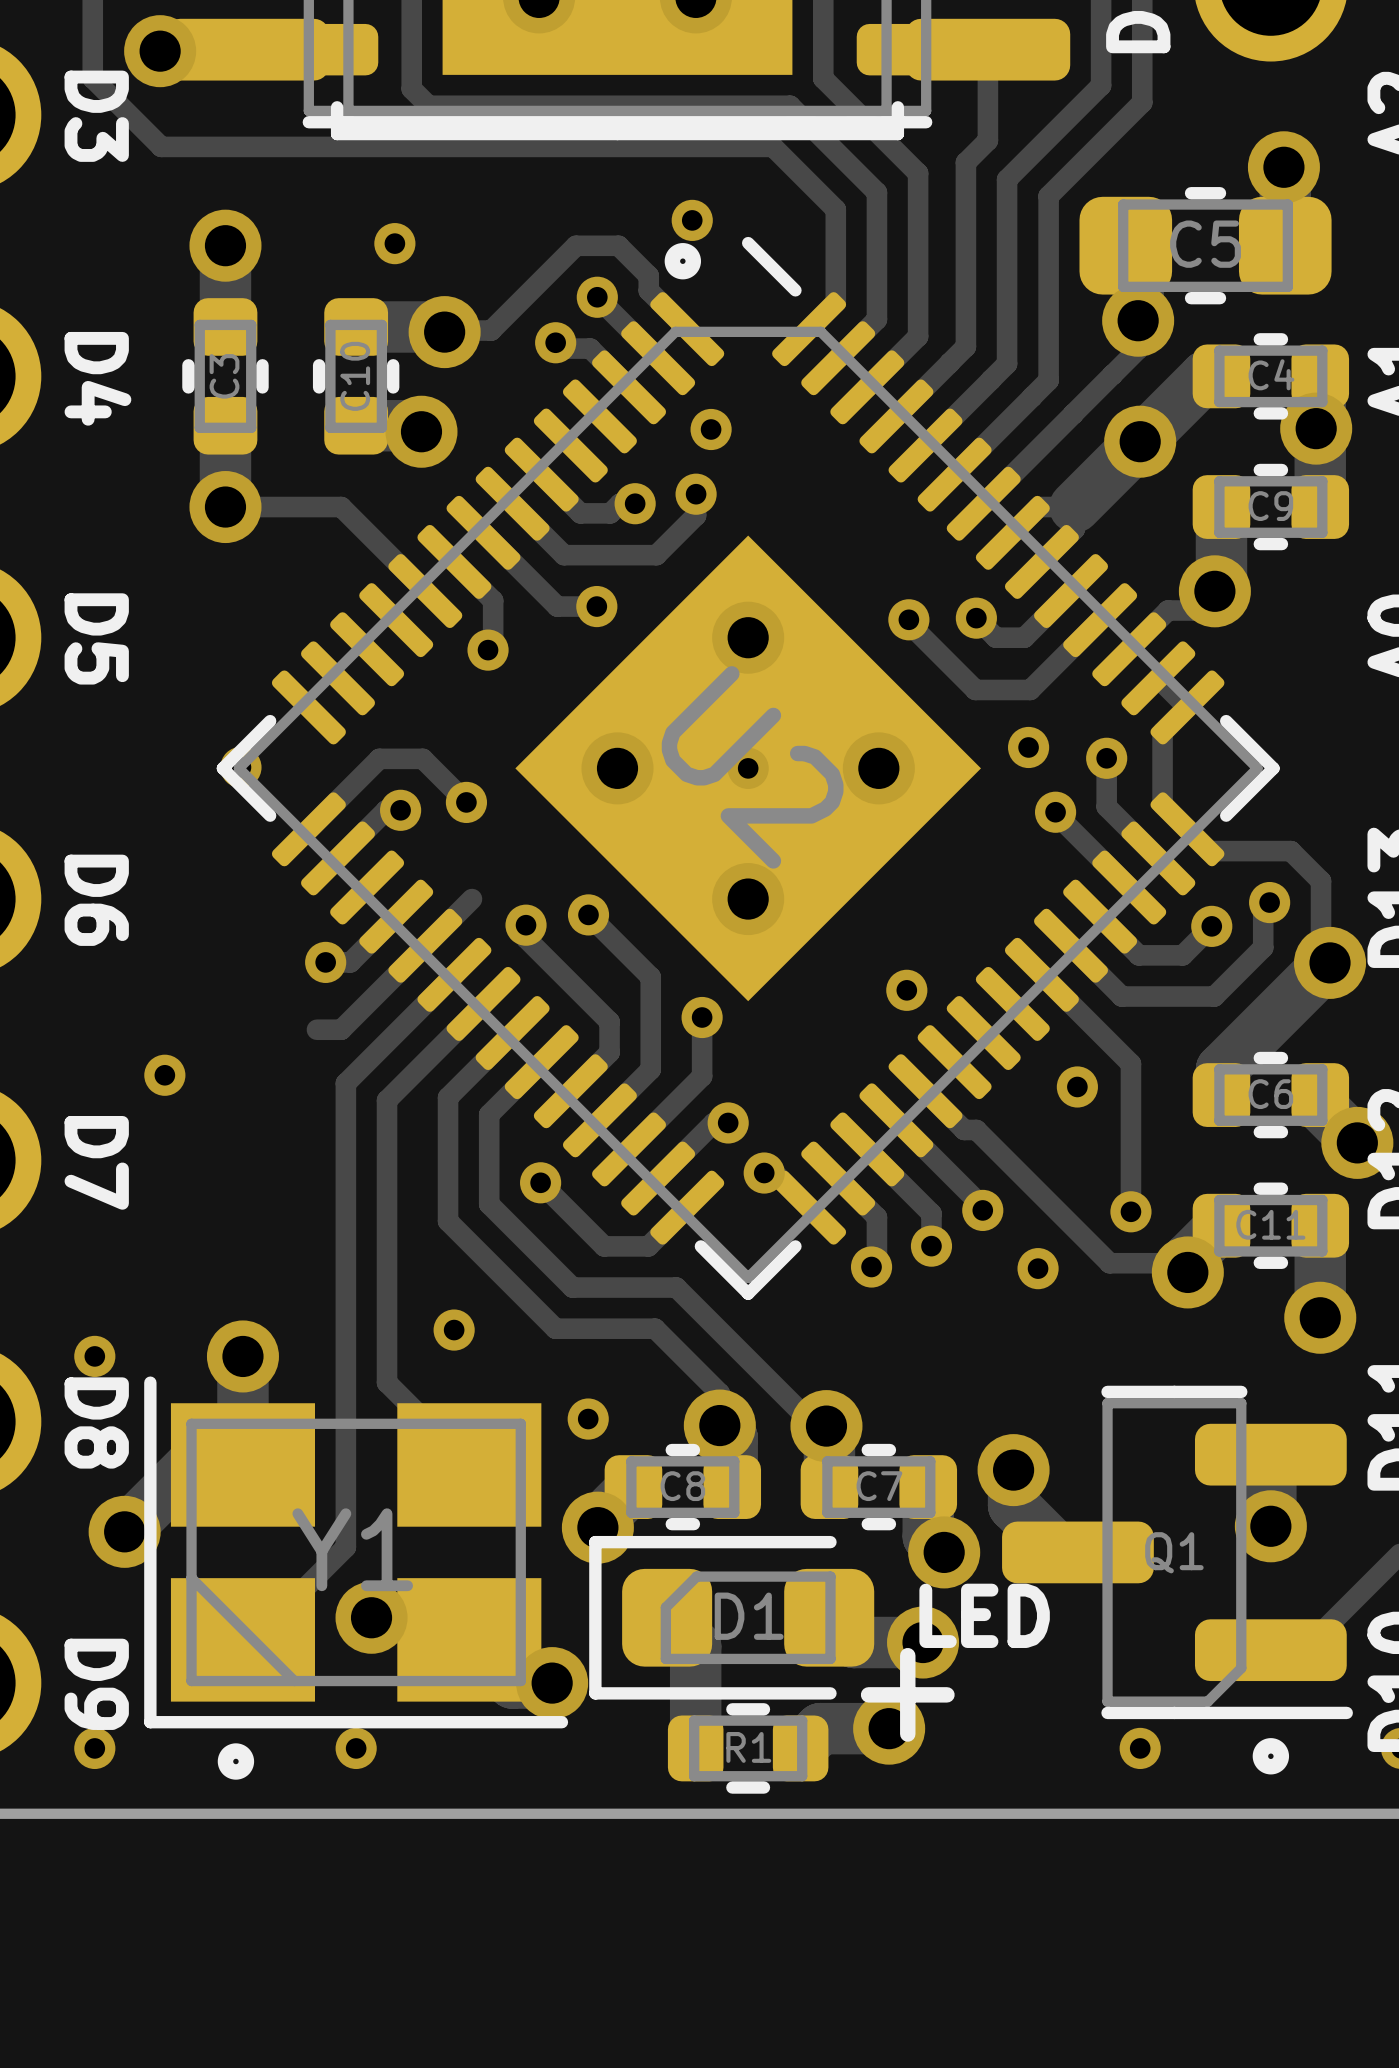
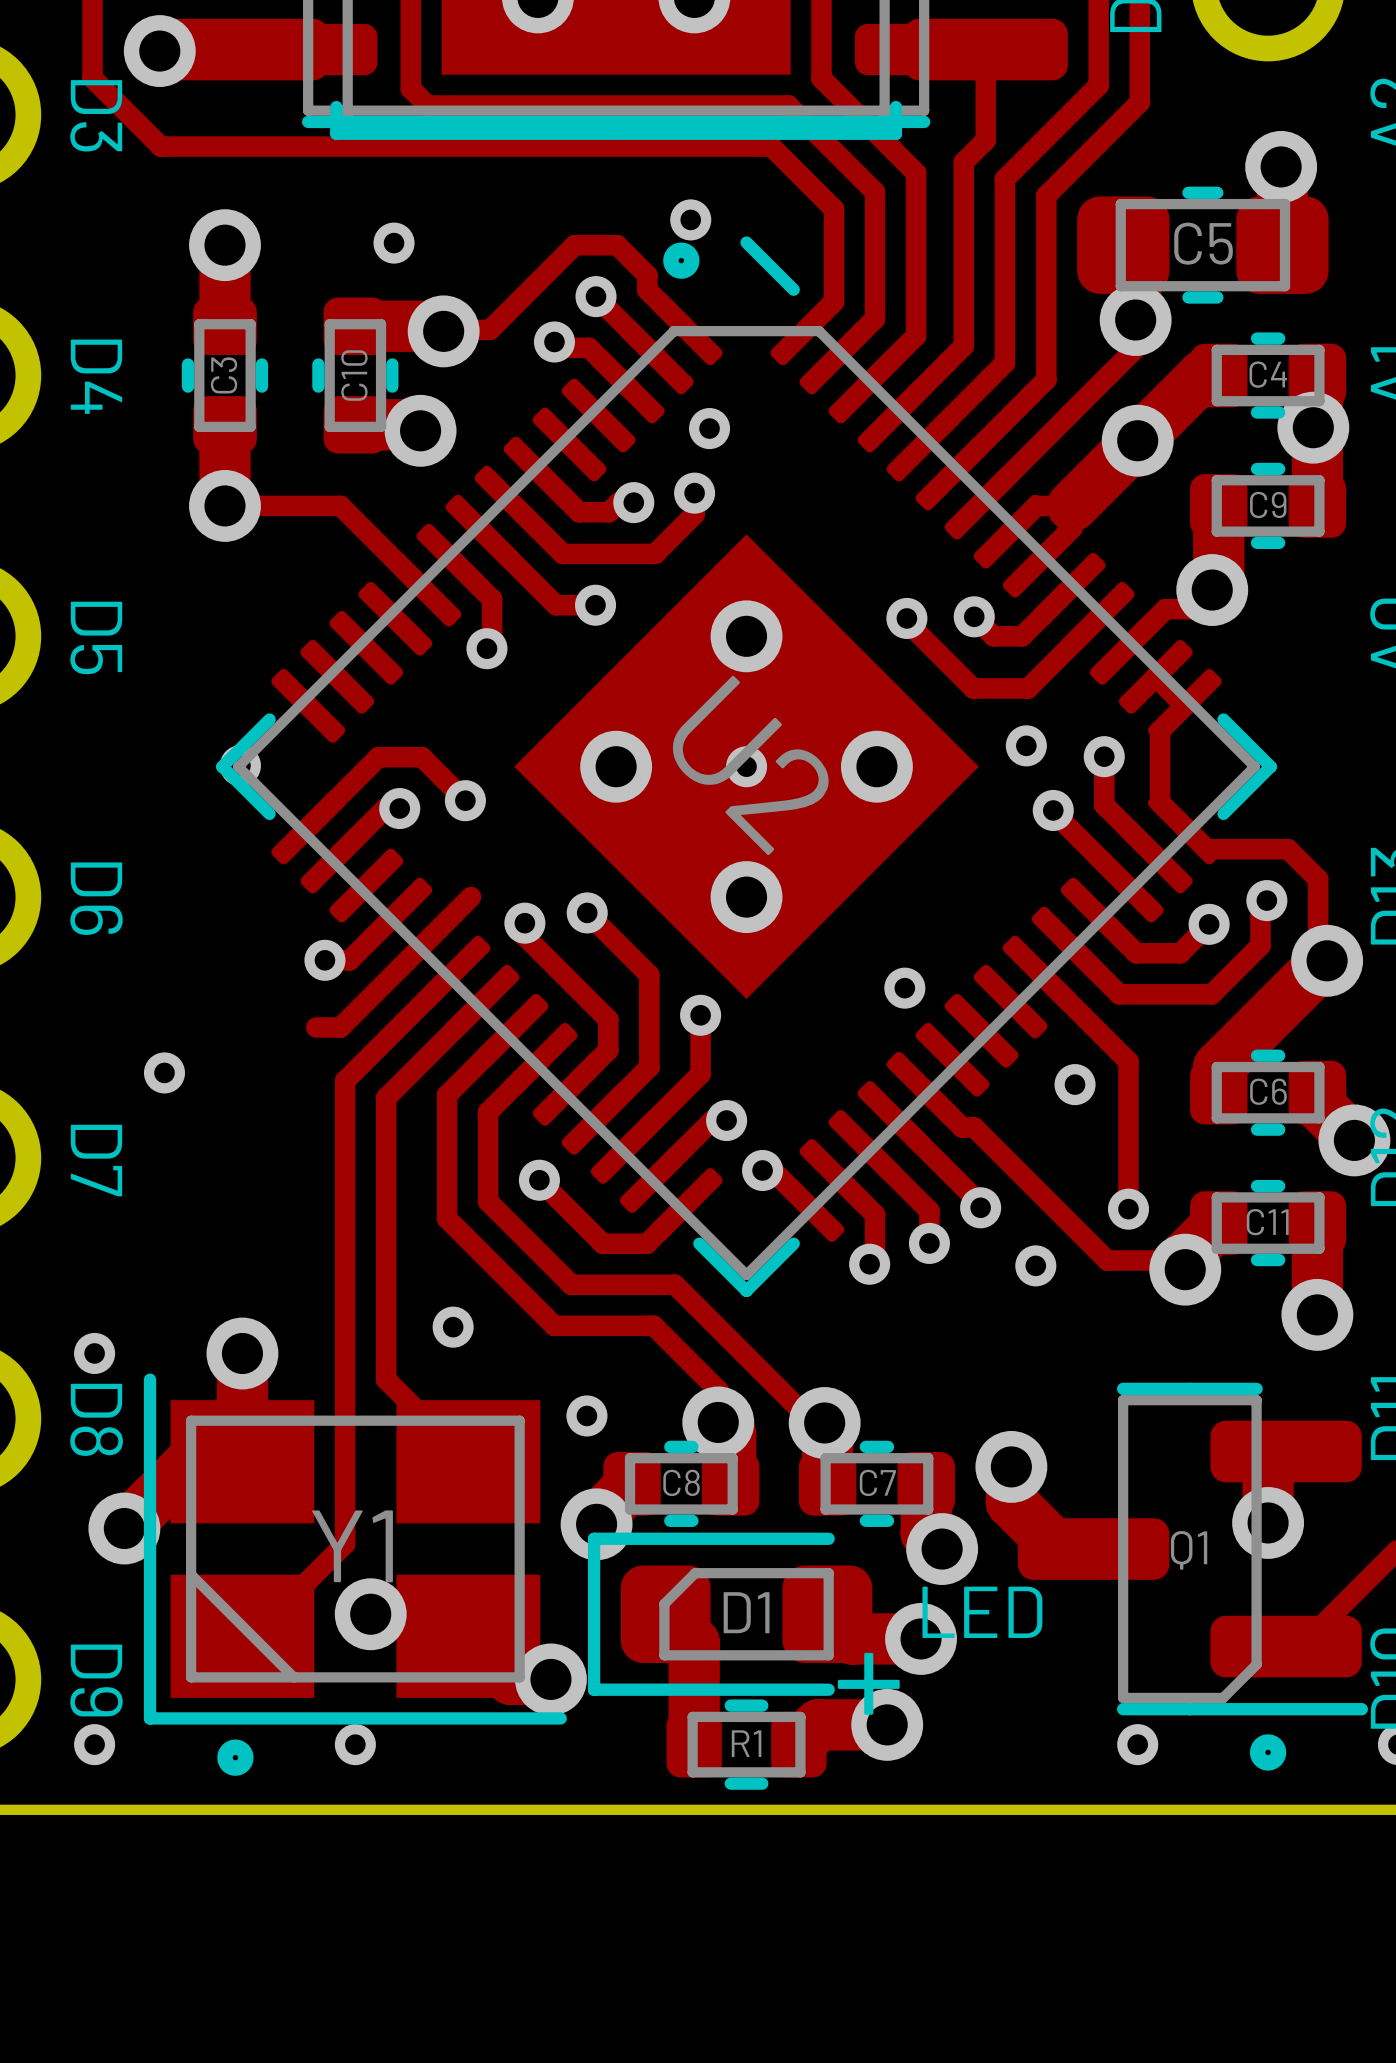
Q1 position: (1177, 1552) -> (1192, 1549)

